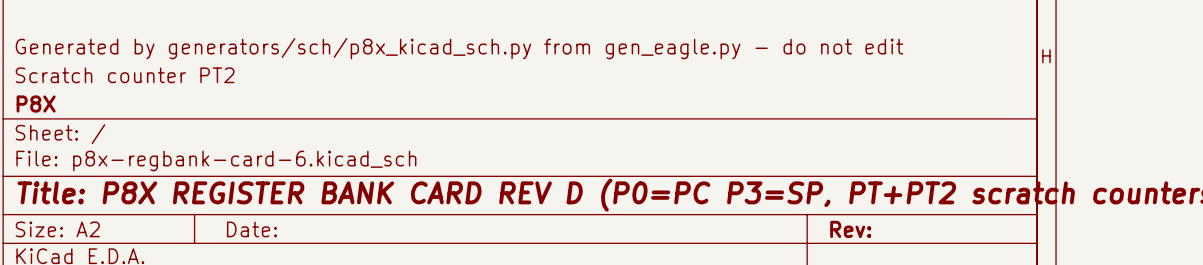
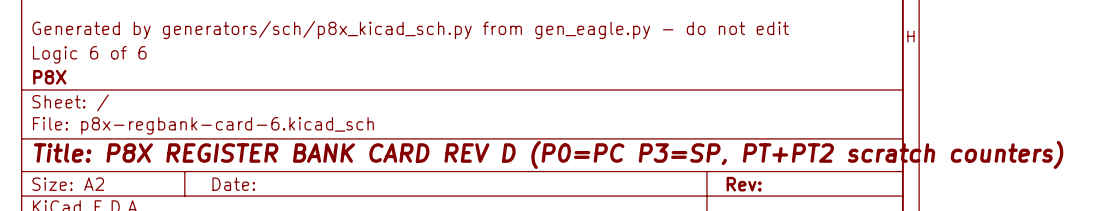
title block: Scratch counter PT2 (125, 75) -> Logic 6 of 6 (89, 54)

